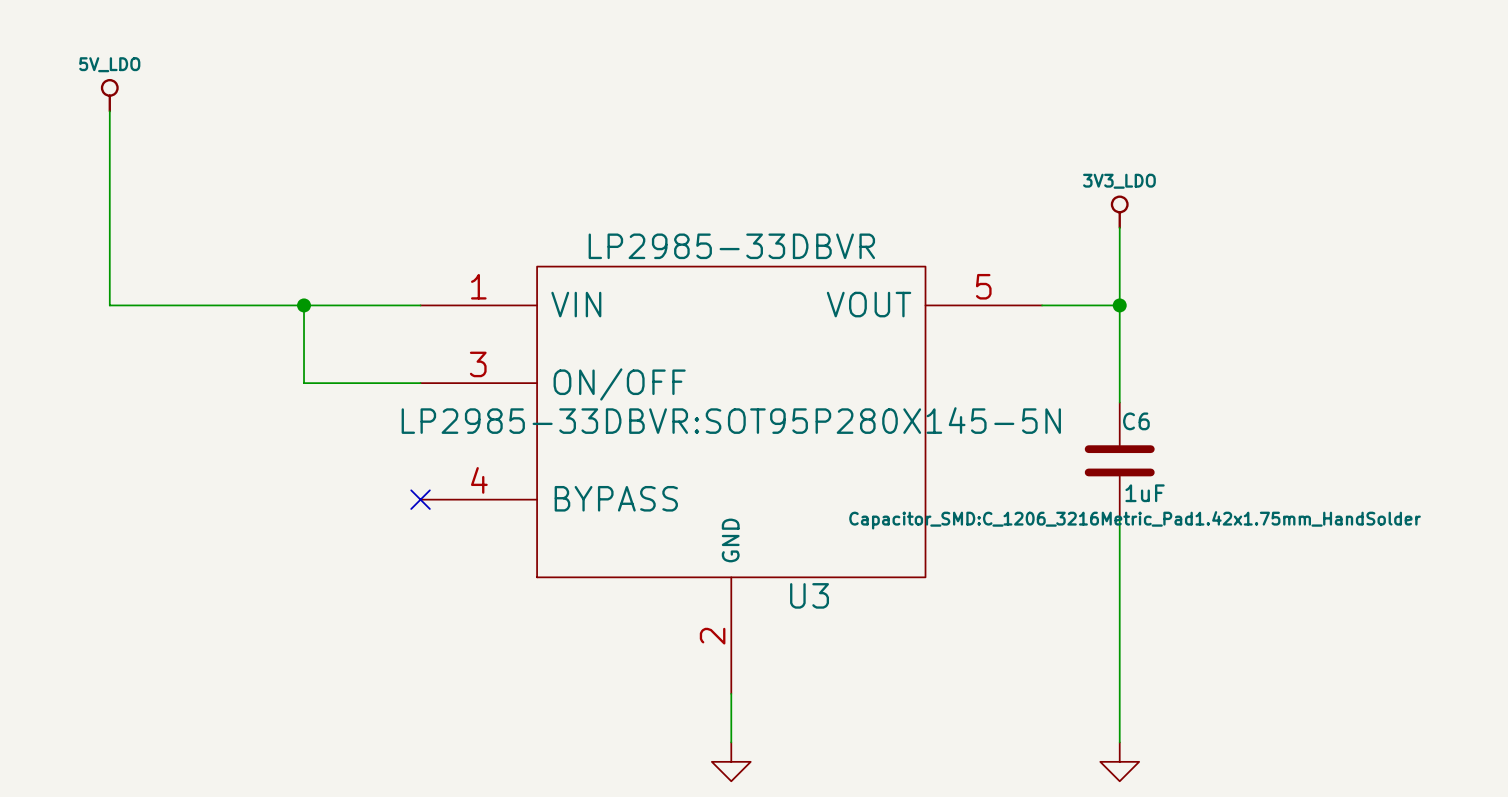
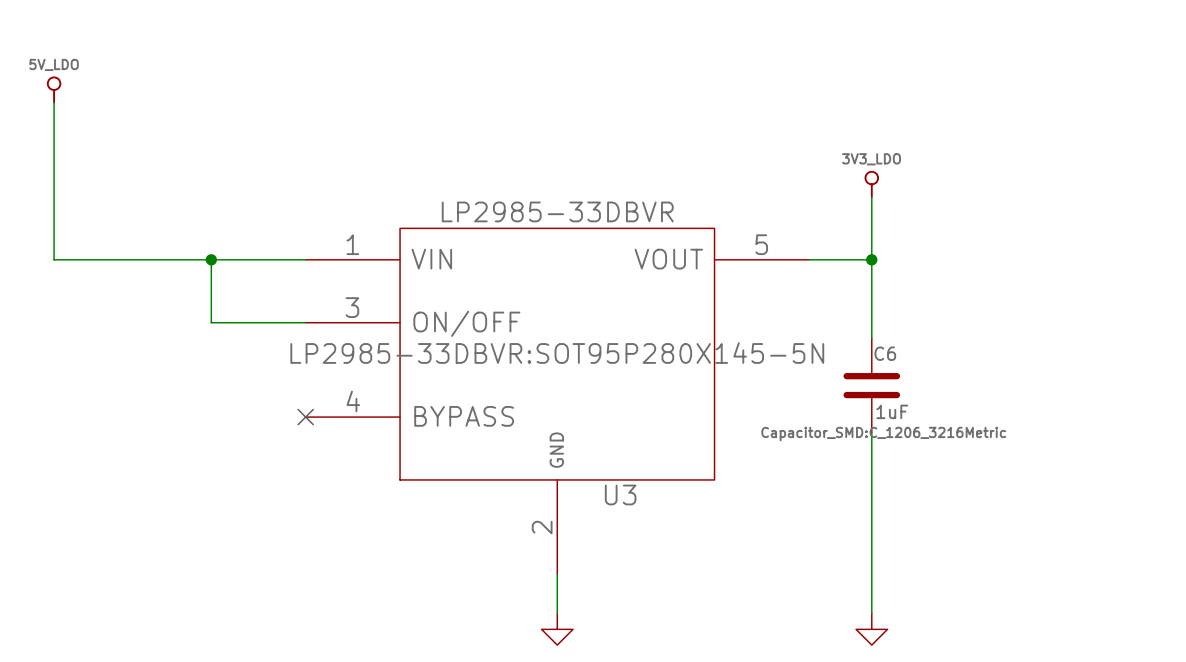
C6 text: Capacitor_SMD:C_1206_3216Metric_Pad1.42x1.75mm_HandSolder (1135, 520) -> Capacitor_SMD:C_1206_3216Metric (883, 434)

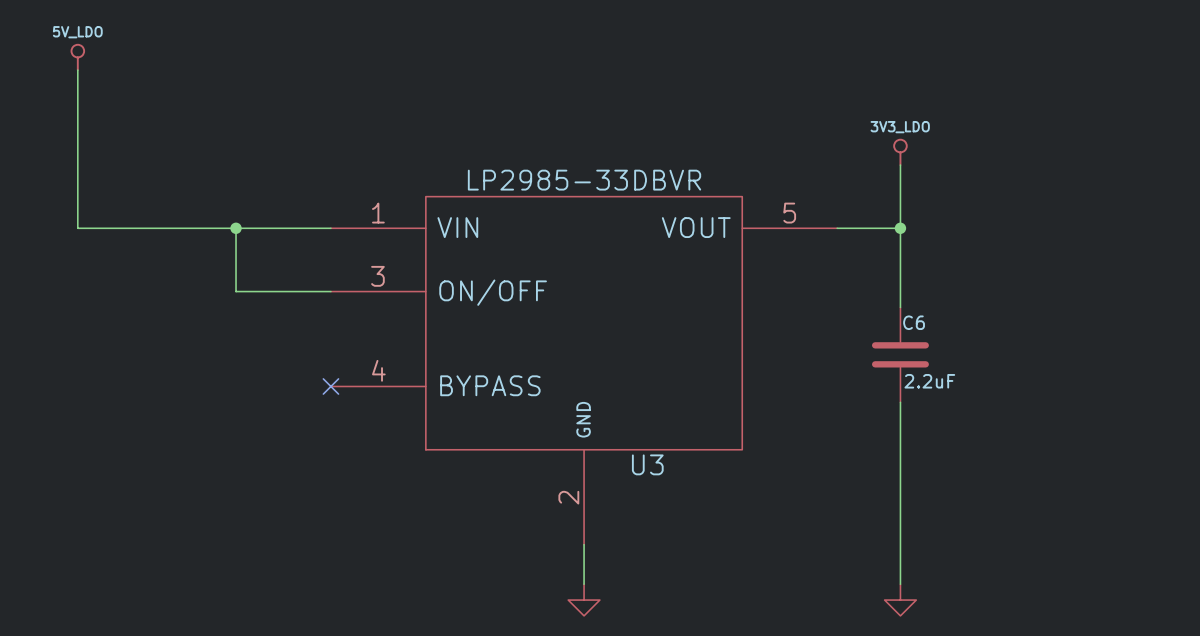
U3 text: LP2985-33DBVR:SOT95P280X145-5N (557, 353) -> none
C6 value: 1uF (892, 411) -> 2.2uF (929, 381)
C6 text: Capacitor_SMD:C_1206_3216Metric (883, 434) -> none

